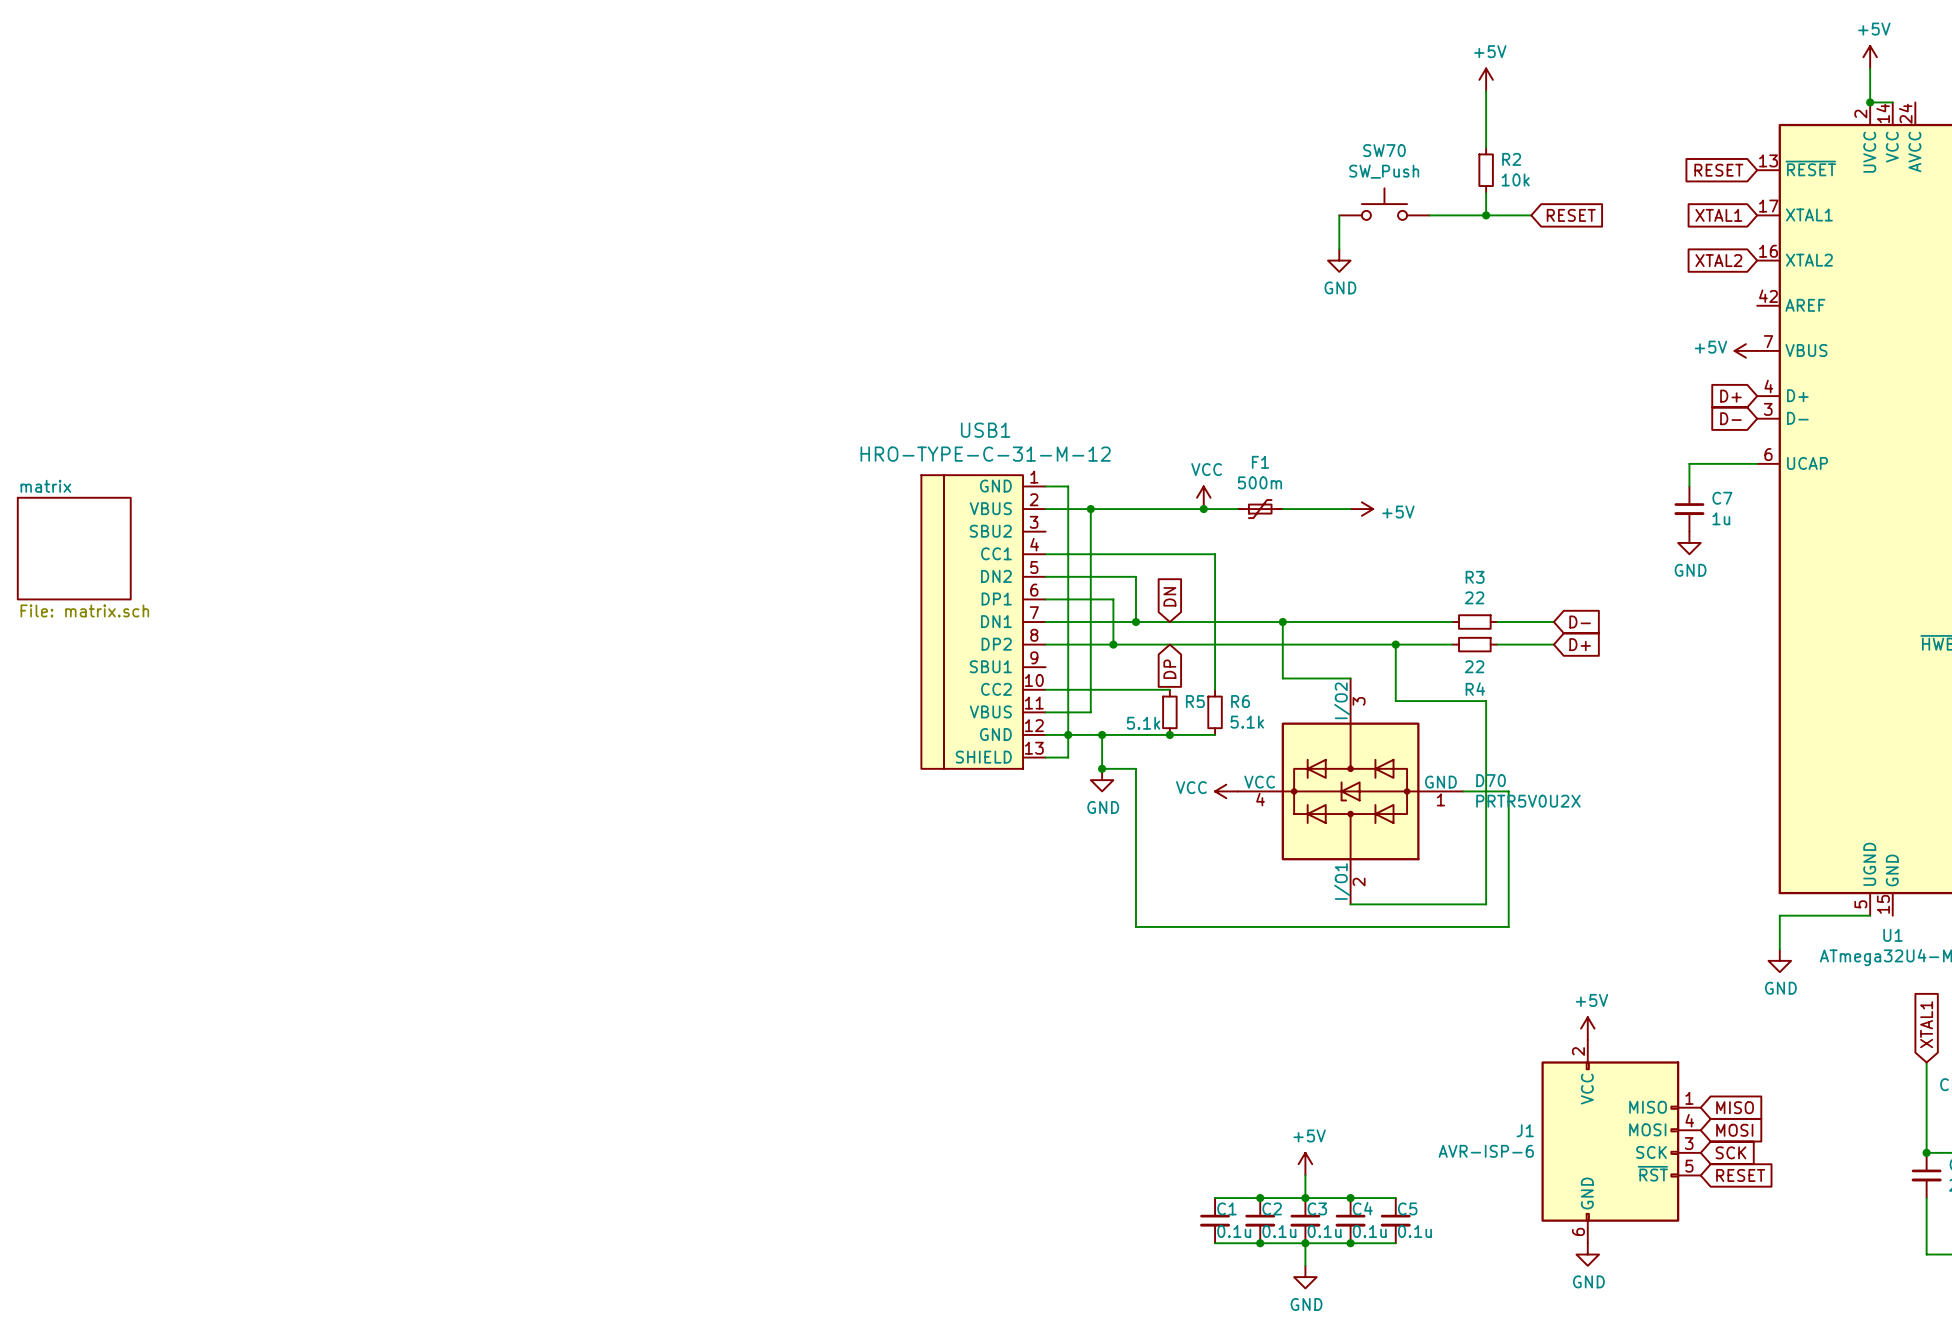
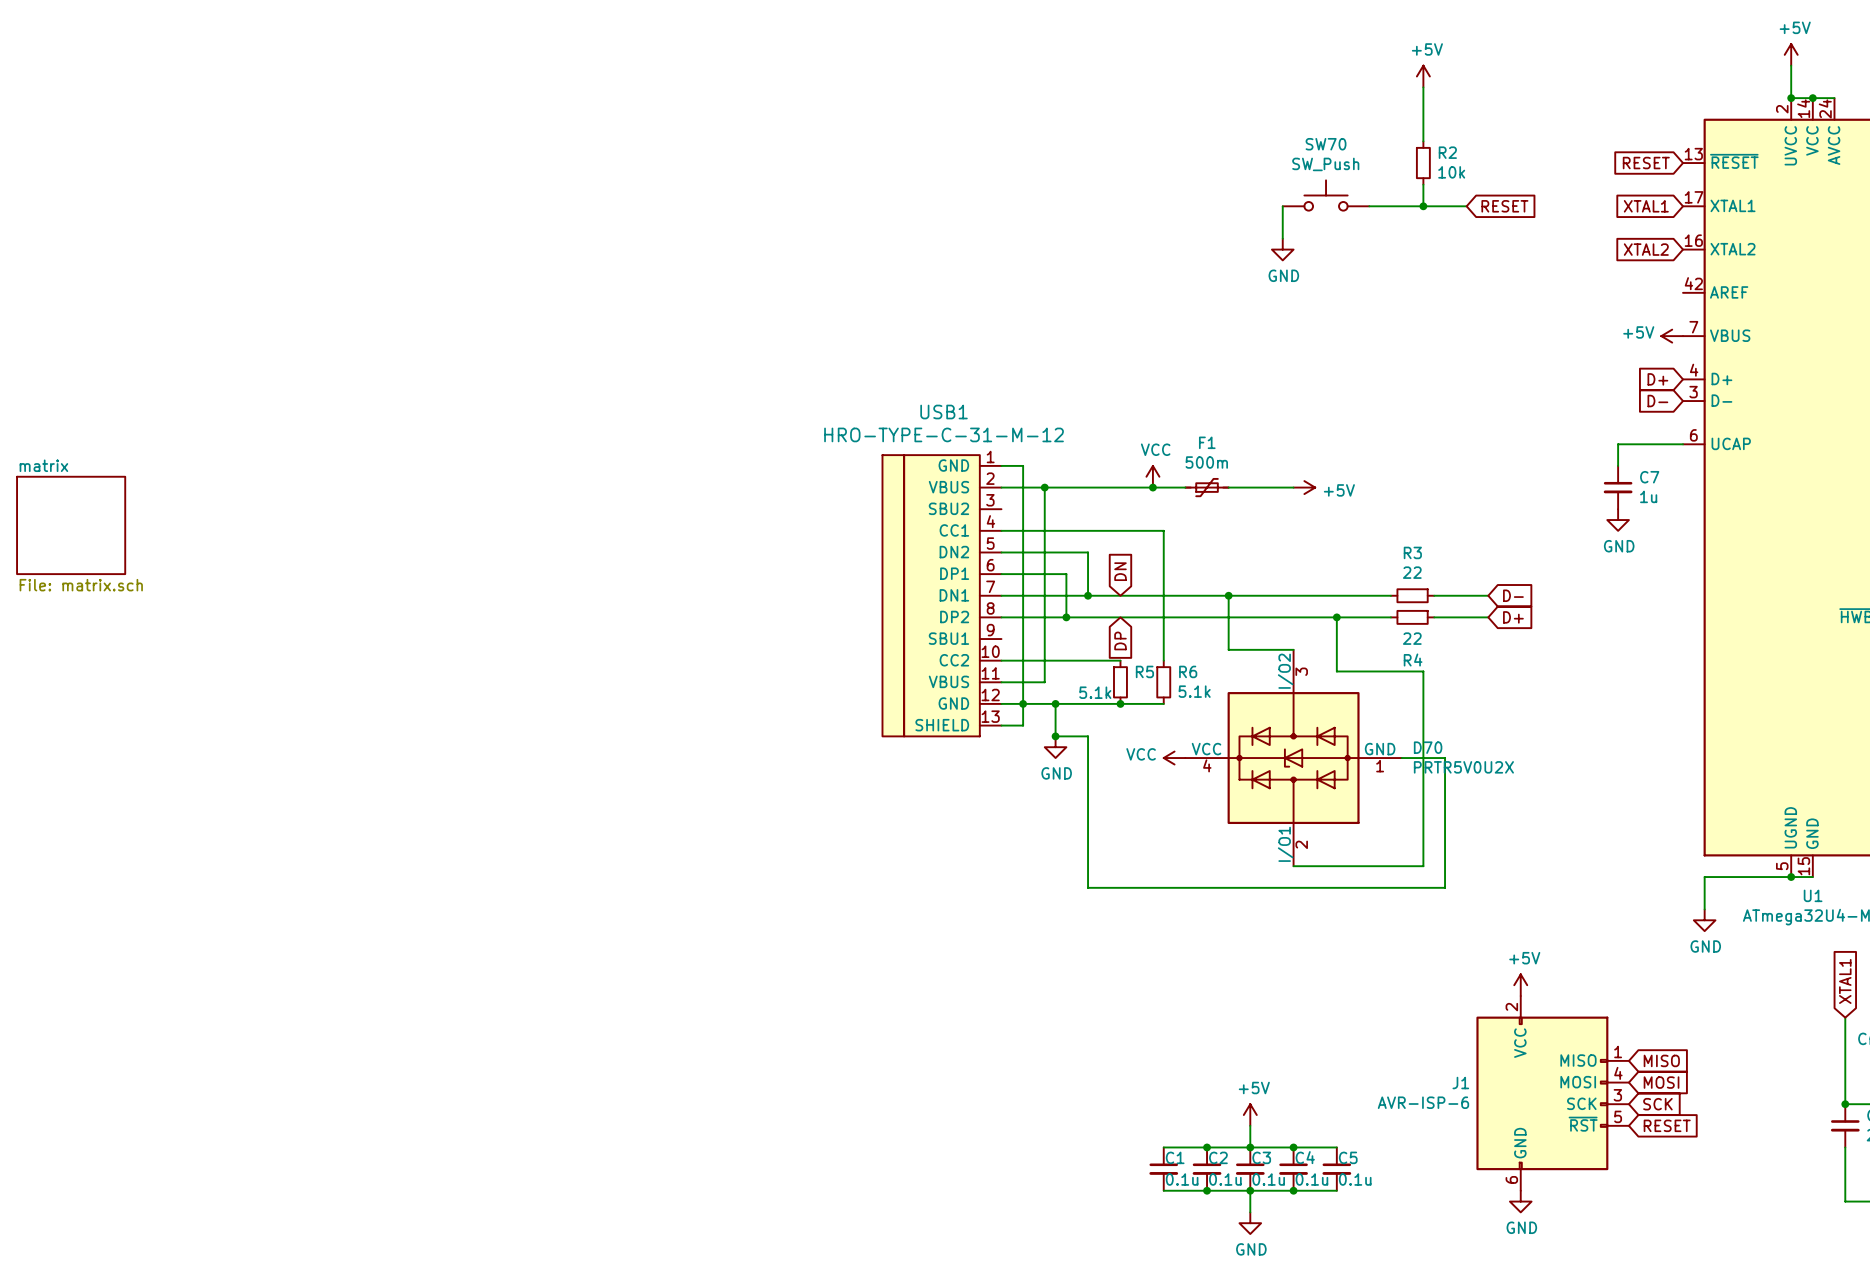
wire: none -> (1812, 98) (1834, 98)
junction: none -> (1812, 98)
wire: none -> (1791, 877) (1812, 877)
junction: none -> (1791, 877)

